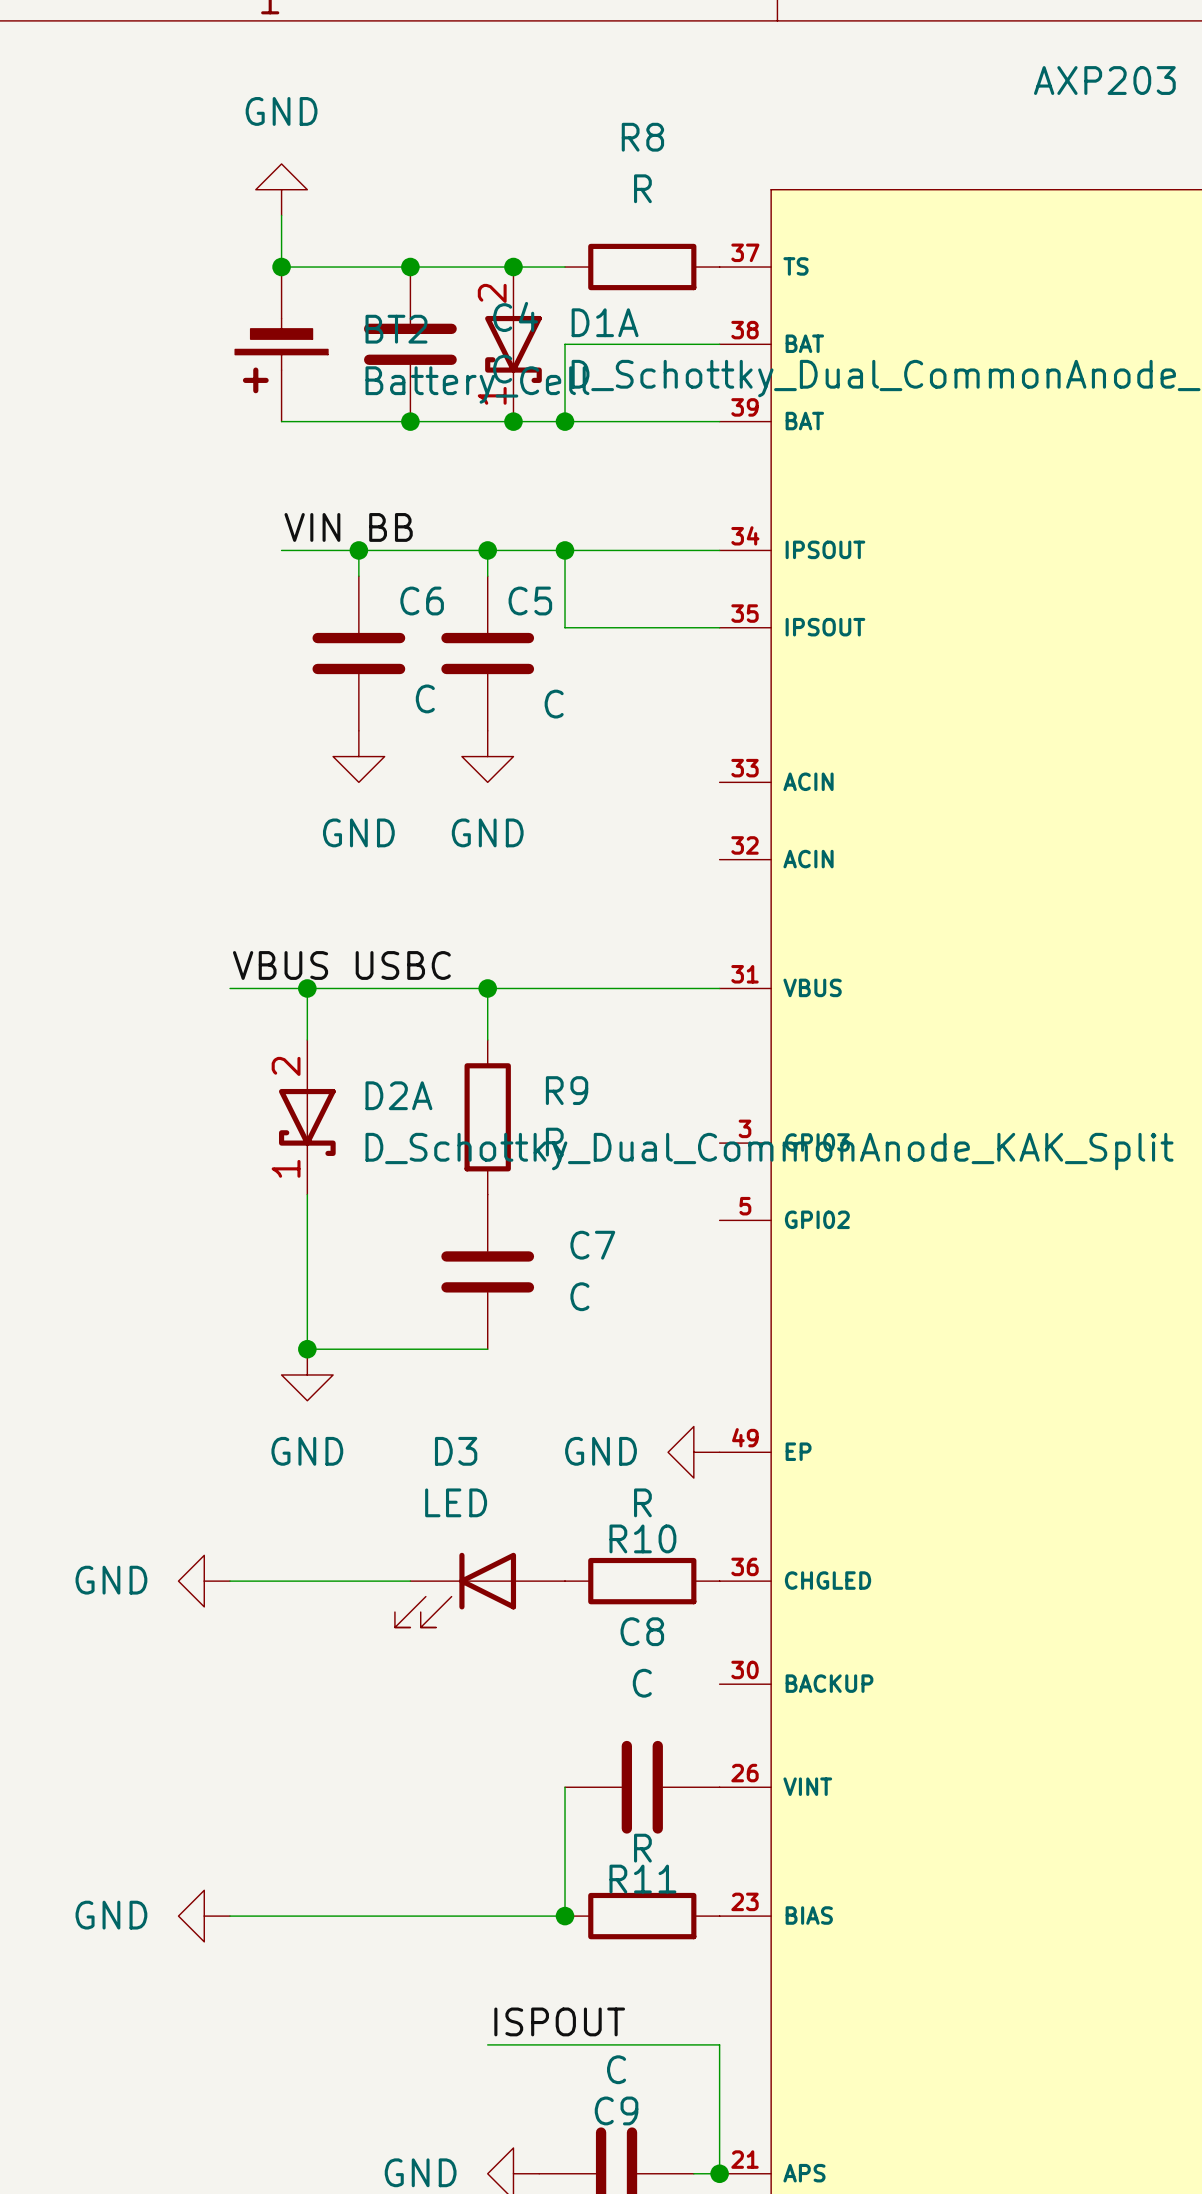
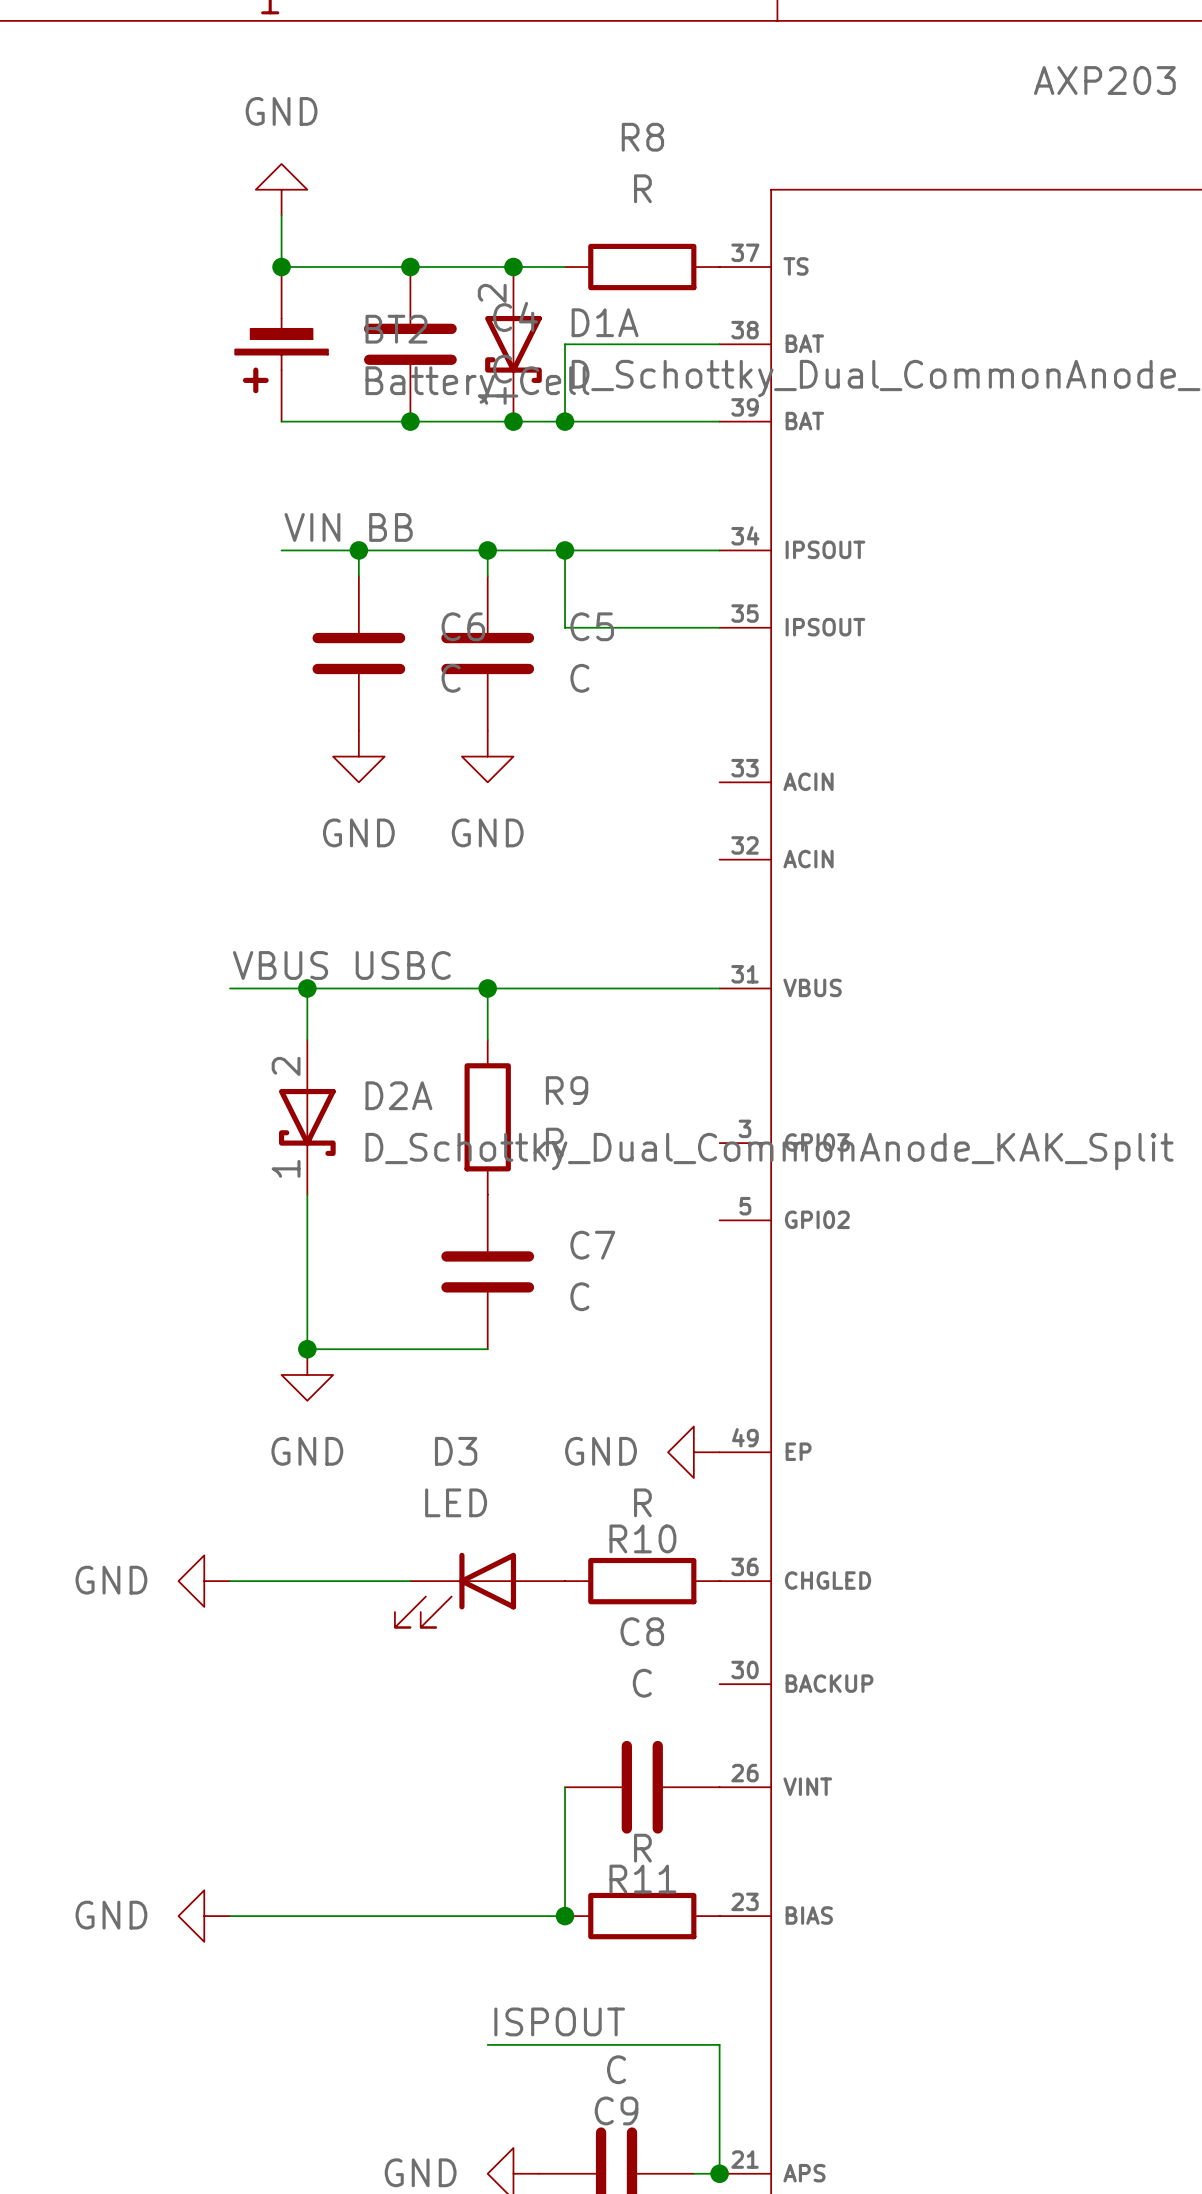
C6 name position: C6 (422, 601) -> C6 (463, 626)
C5 name position: C5 (530, 601) -> C5 (592, 626)
C6 value position: C (425, 698) -> C (451, 678)
C5 value position: C (554, 704) -> C (579, 678)

